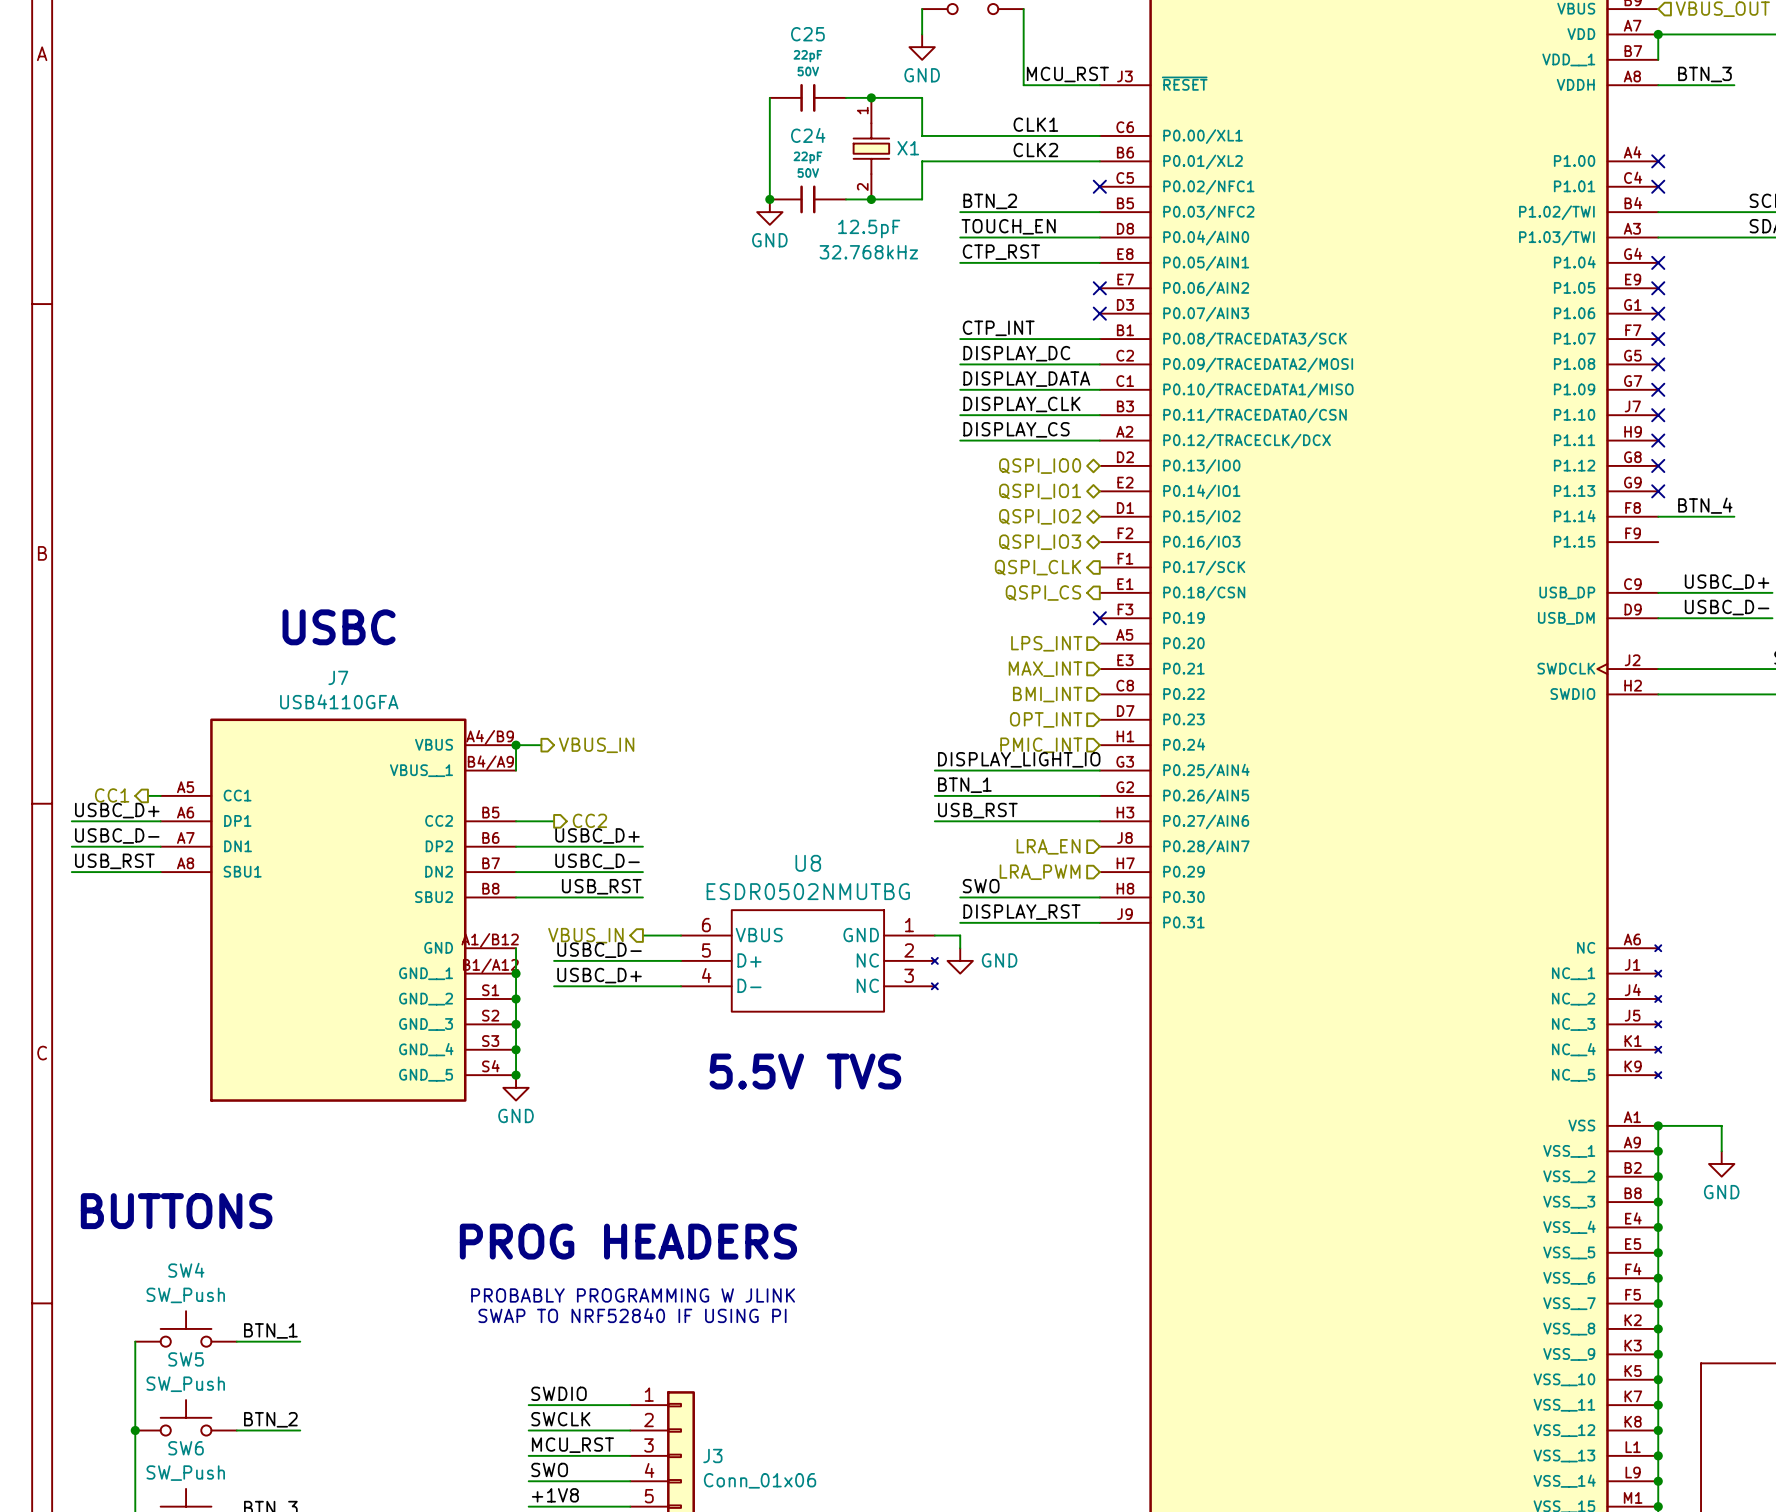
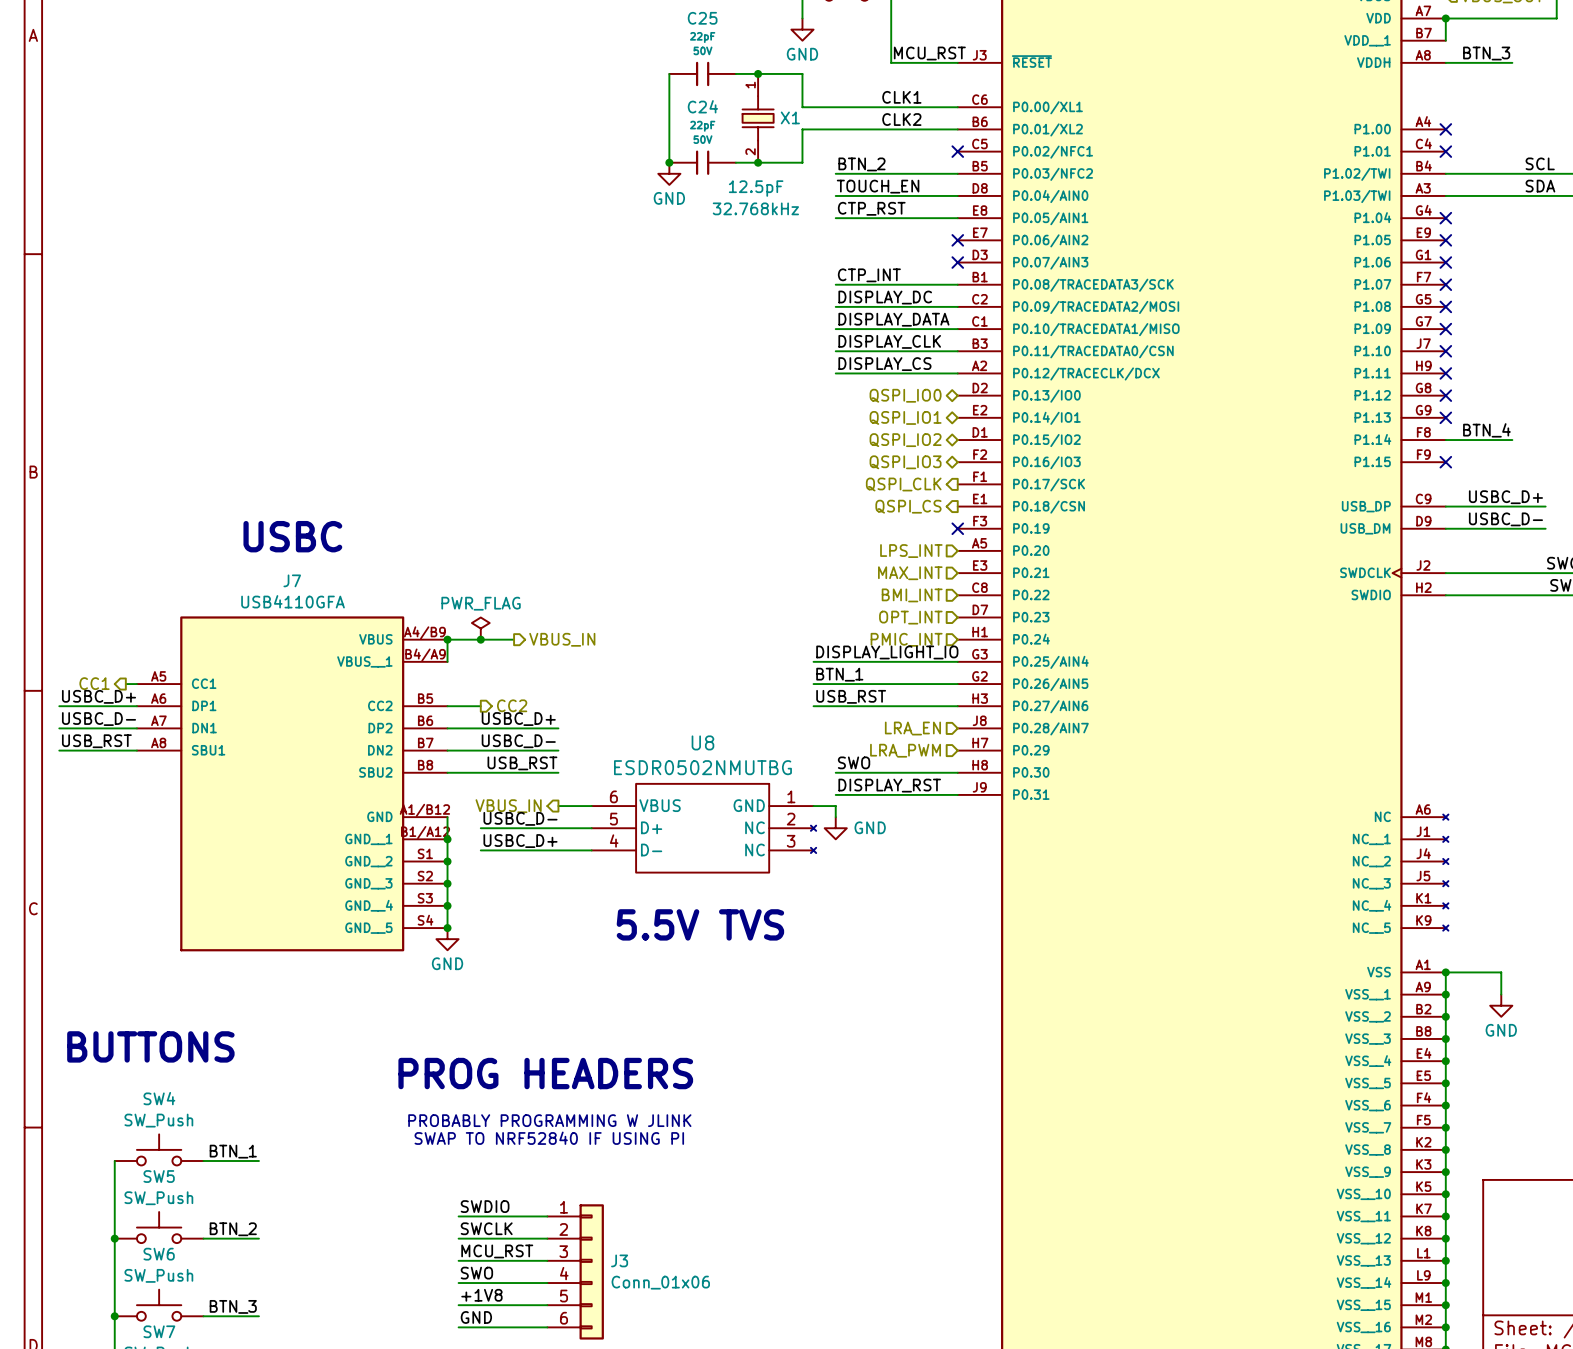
no-connect mark: none -> (1445, 462)
power symbol: none -> PWR_FLAG (480, 628)
wire: none -> (469, 639) (514, 639)
junction: none -> (480, 639)
hierarchical label position: VBUS_IN (596, 745) -> VBUS_IN (562, 639)

